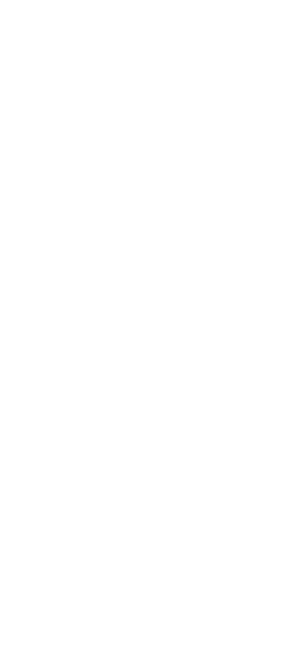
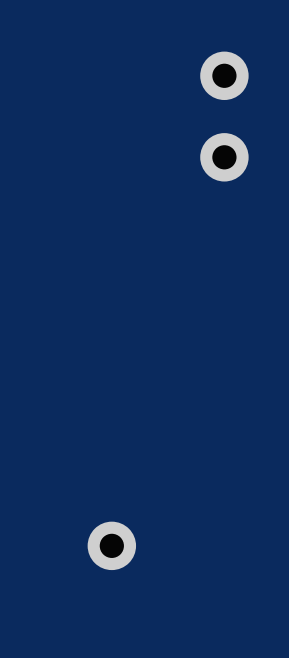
part: none -> (224, 75)
part: none -> (224, 157)
part: none -> (111, 545)

